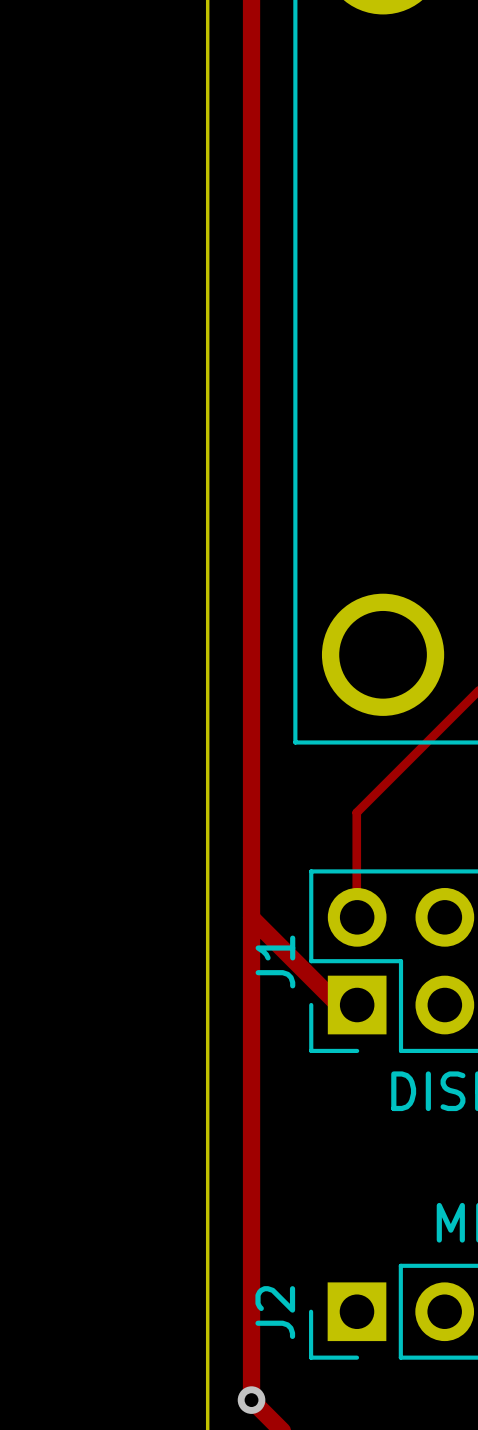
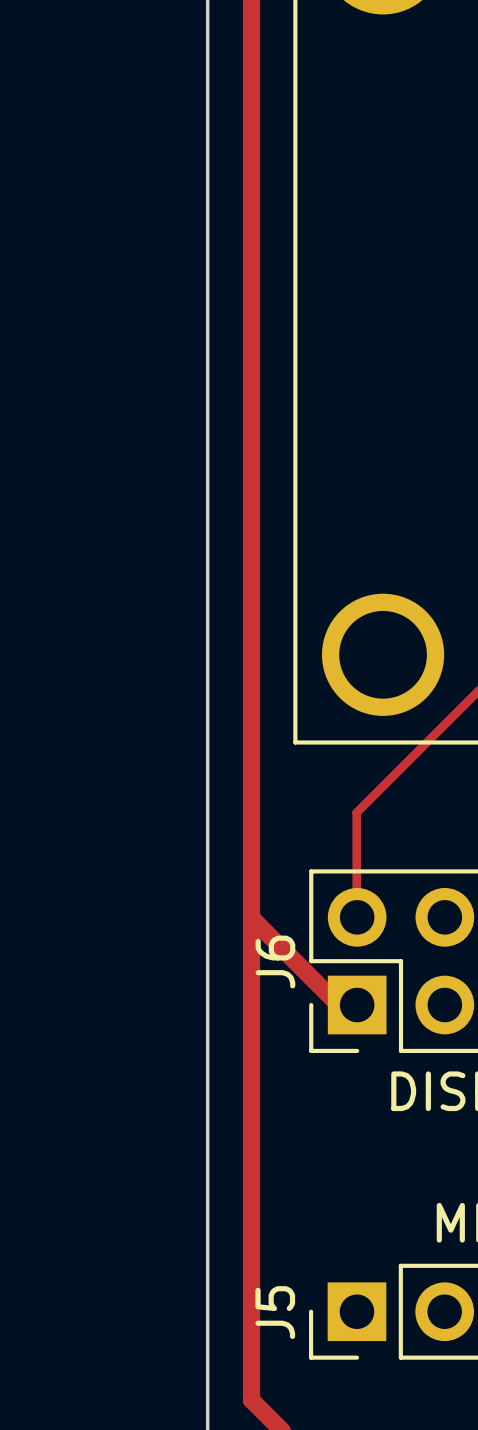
J1 name: J1 (275, 962) -> J6 (275, 962)
J2 name: J2 (275, 1312) -> J5 (275, 1312)
via: (251, 1400) -> none

